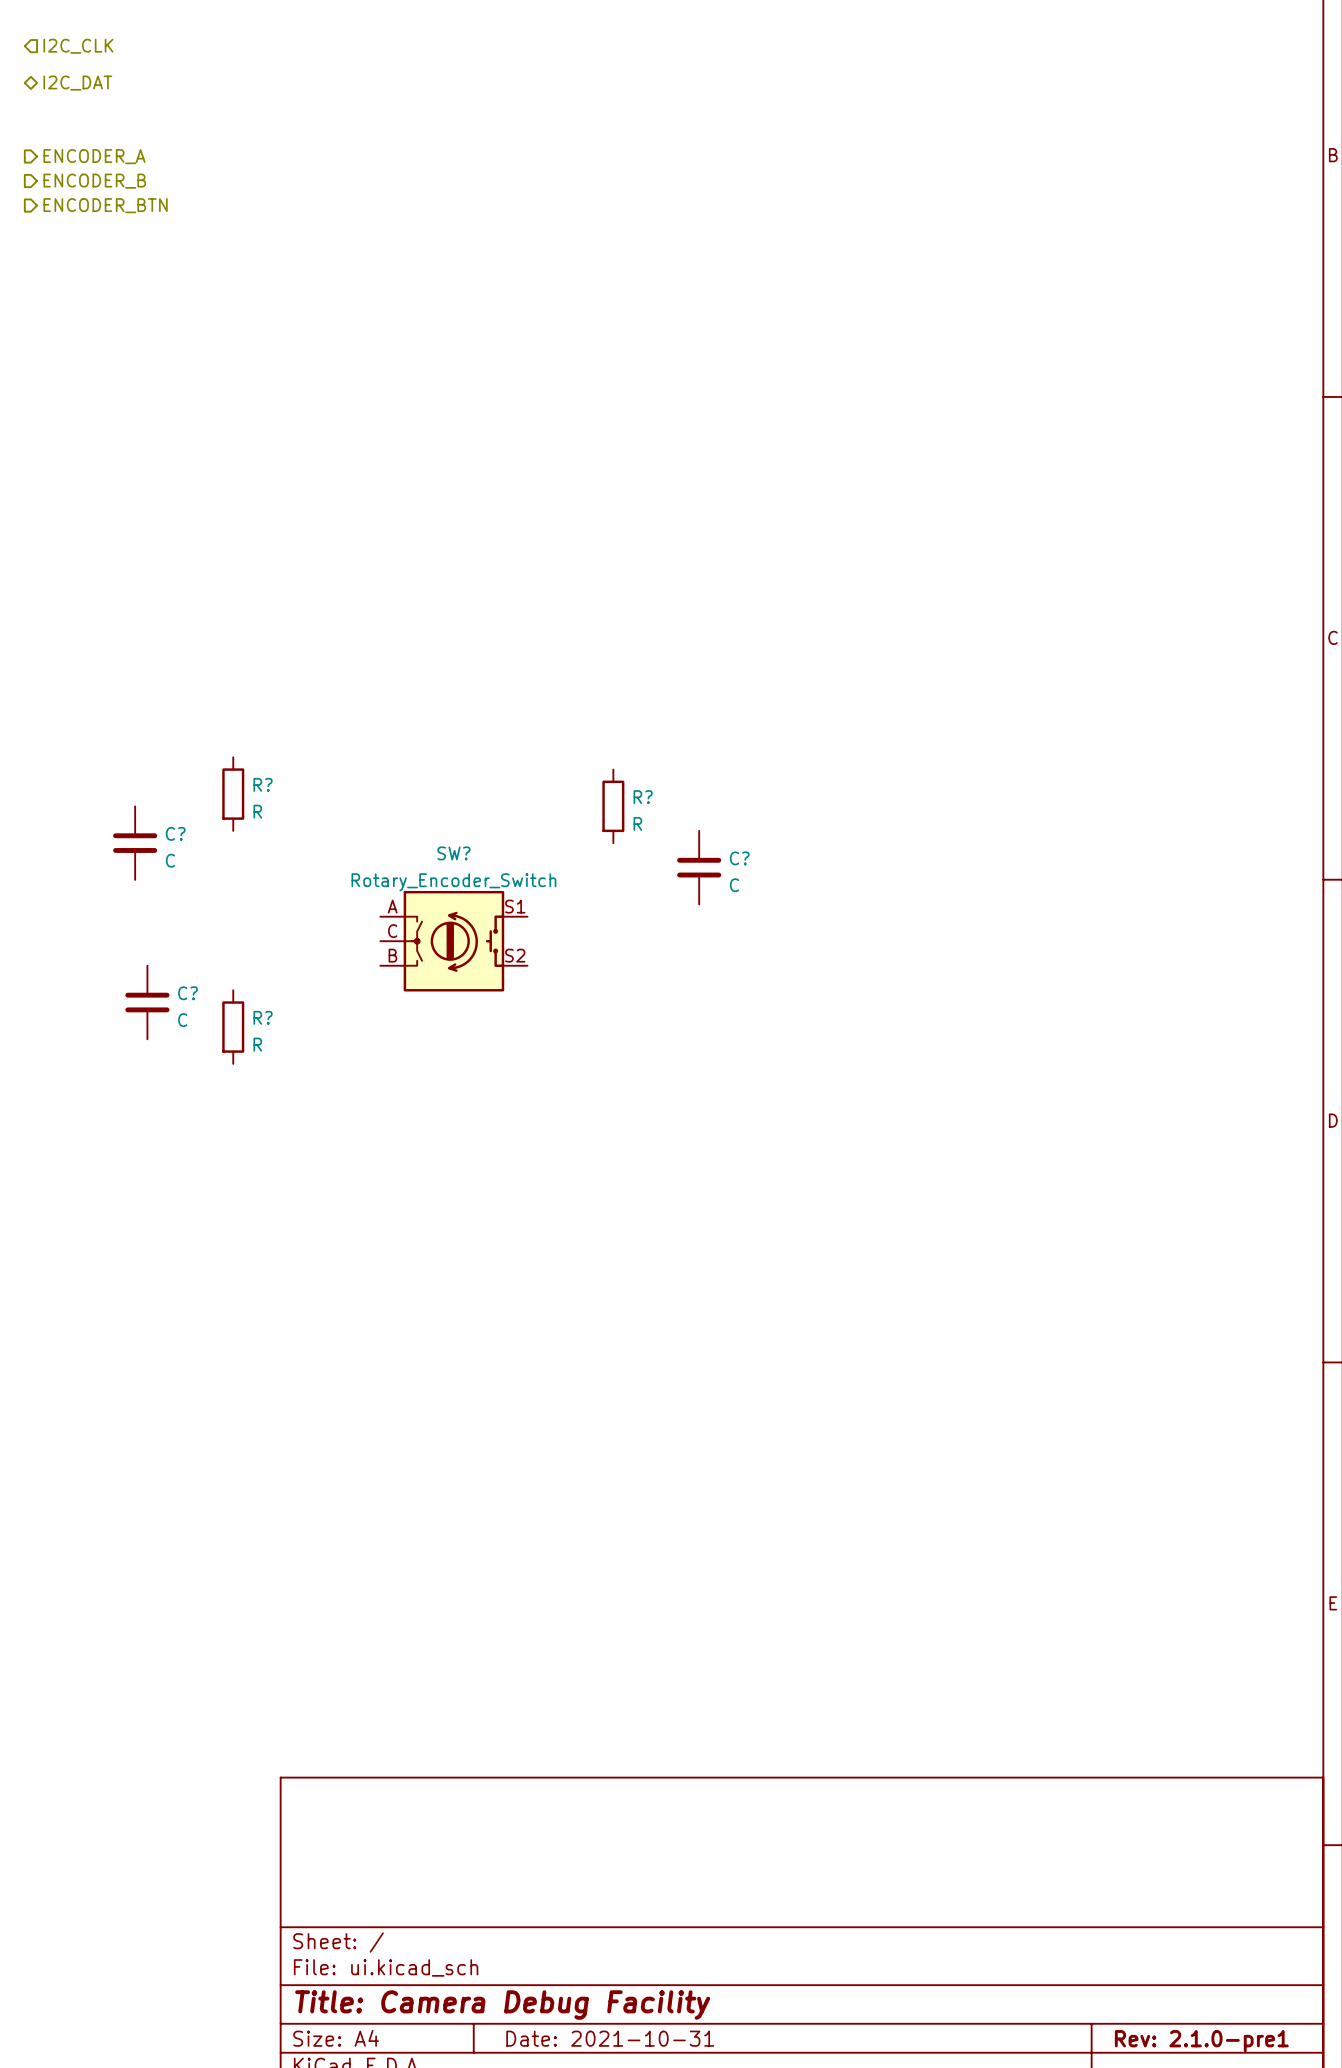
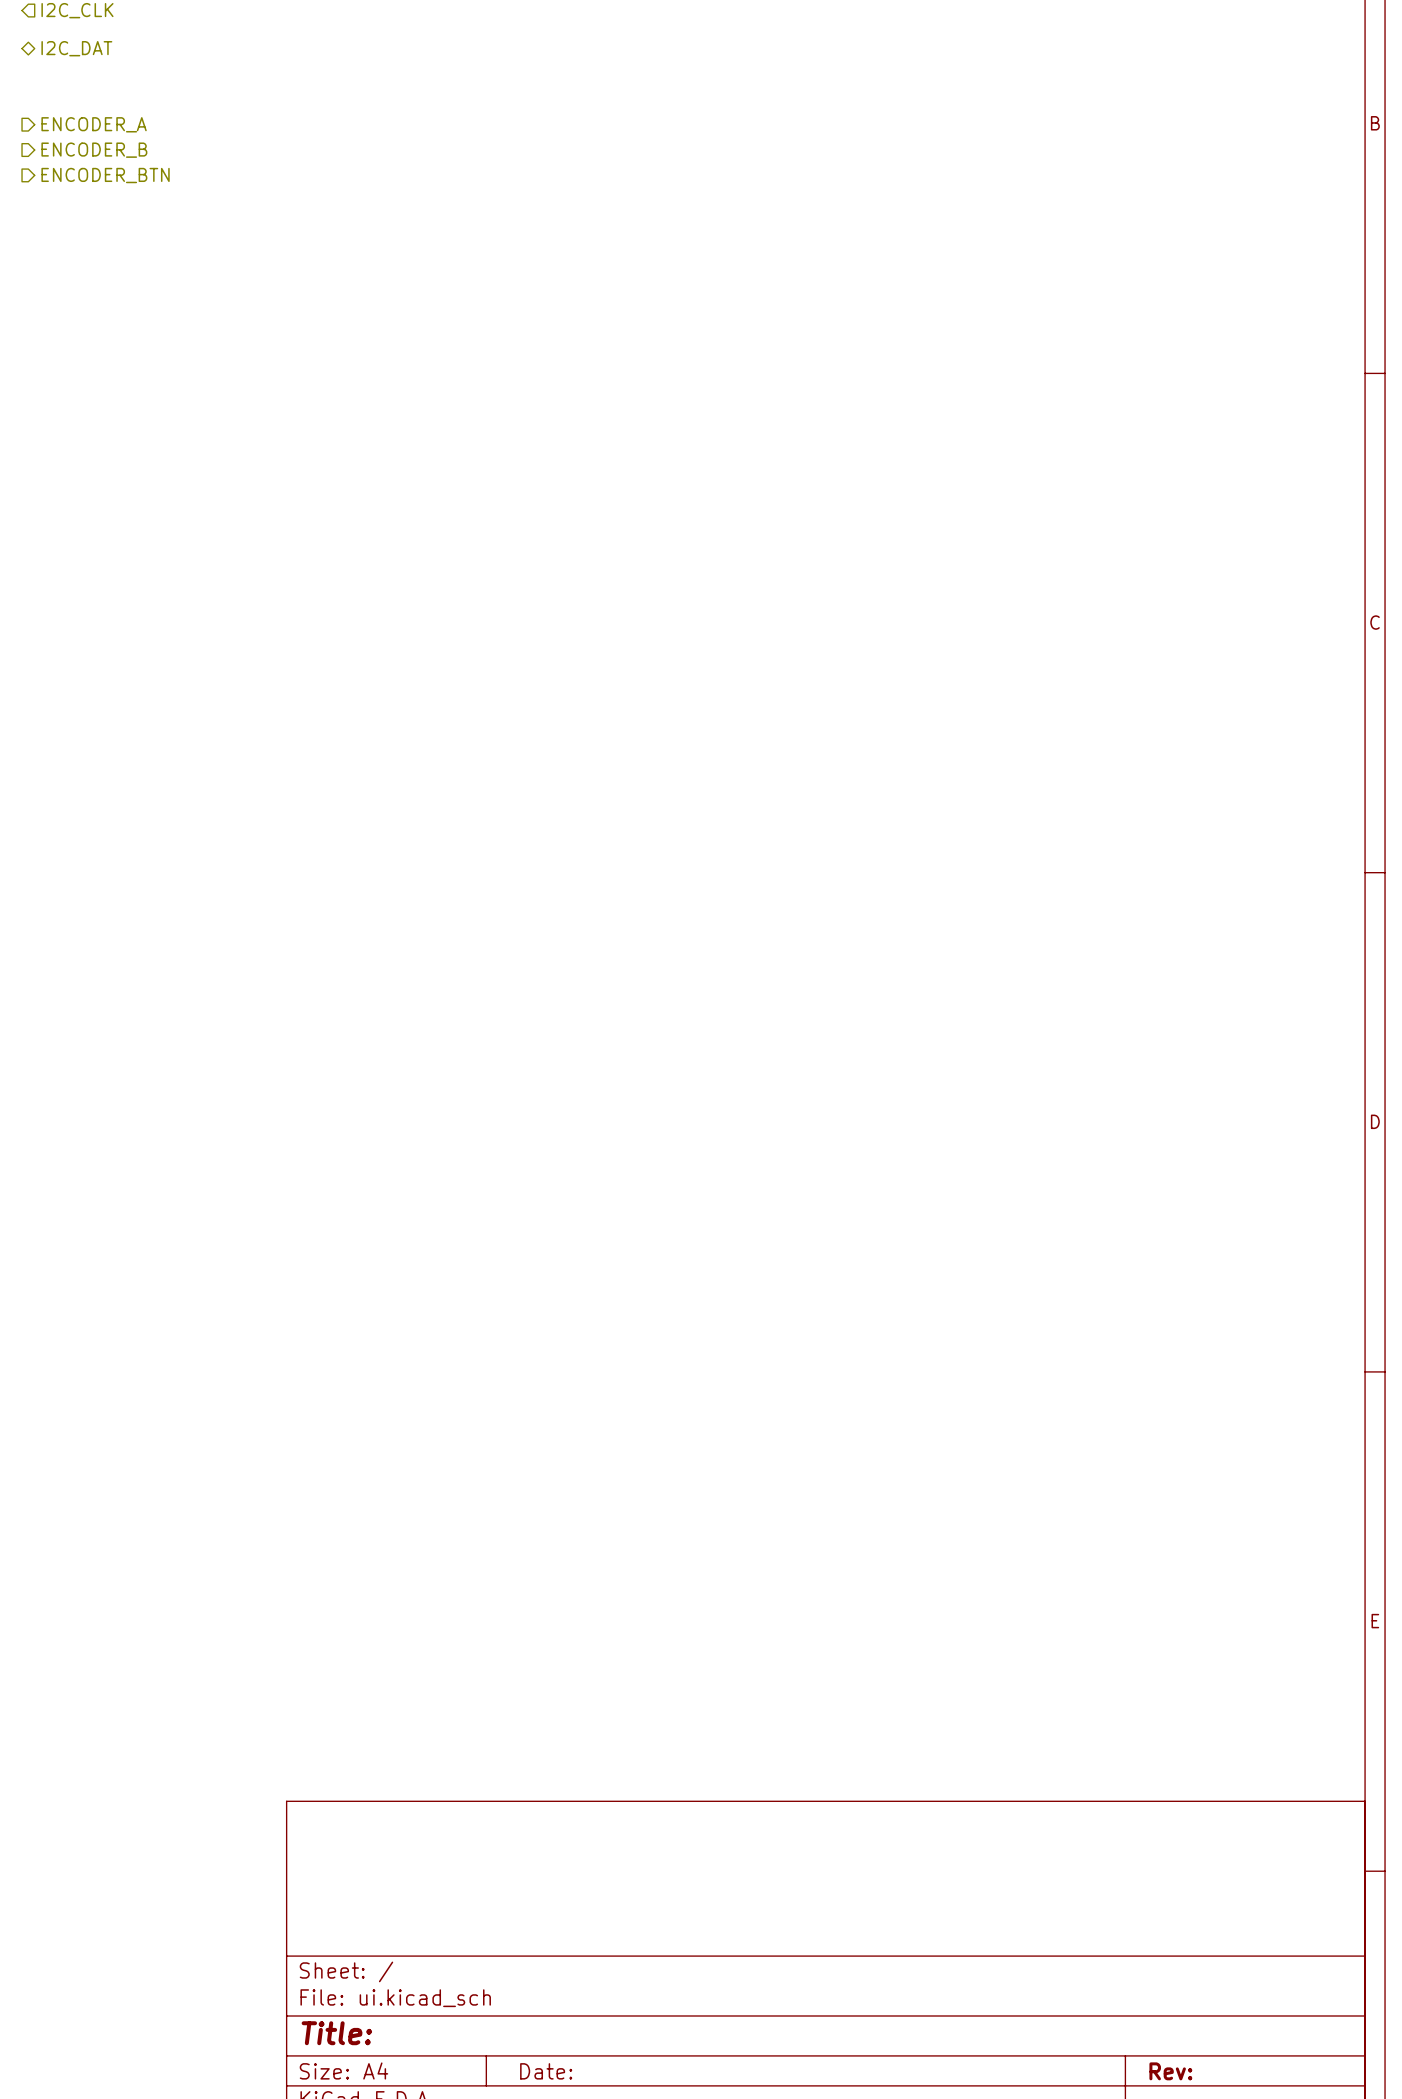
R?: R (233, 794) -> none
R?: R (613, 806) -> none
C?: C (135, 843) -> none
C?: C (699, 867) -> none
SW?: Rotary_Encoder_Switch (453, 941) -> none
C?: C (147, 1002) -> none
R?: R (233, 1027) -> none
title block: Title: Camera Debug Facility (502, 2005) -> Title: (336, 2033)
title block: Date: 2021-10-31 (610, 2038) -> Date: (546, 2071)
title block: Rev: 2.1.0-pre1 (1201, 2041) -> Rev: (1170, 2071)

